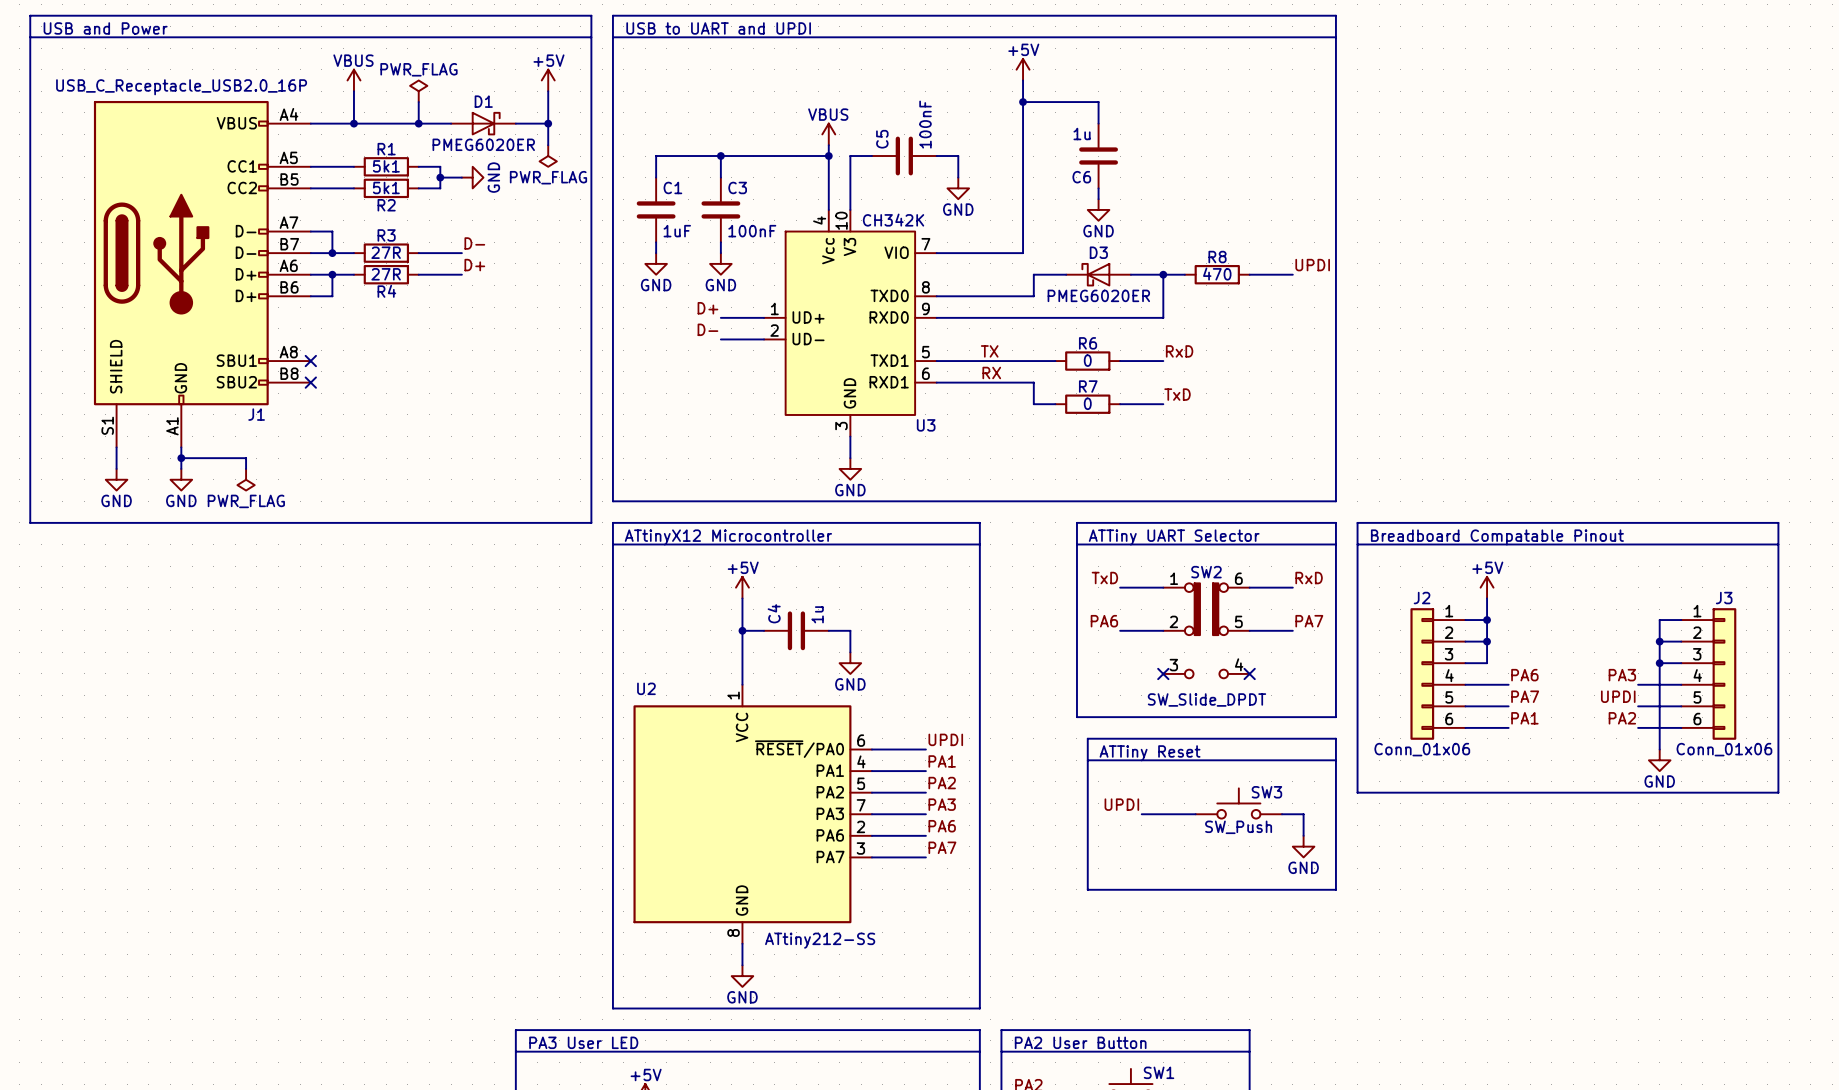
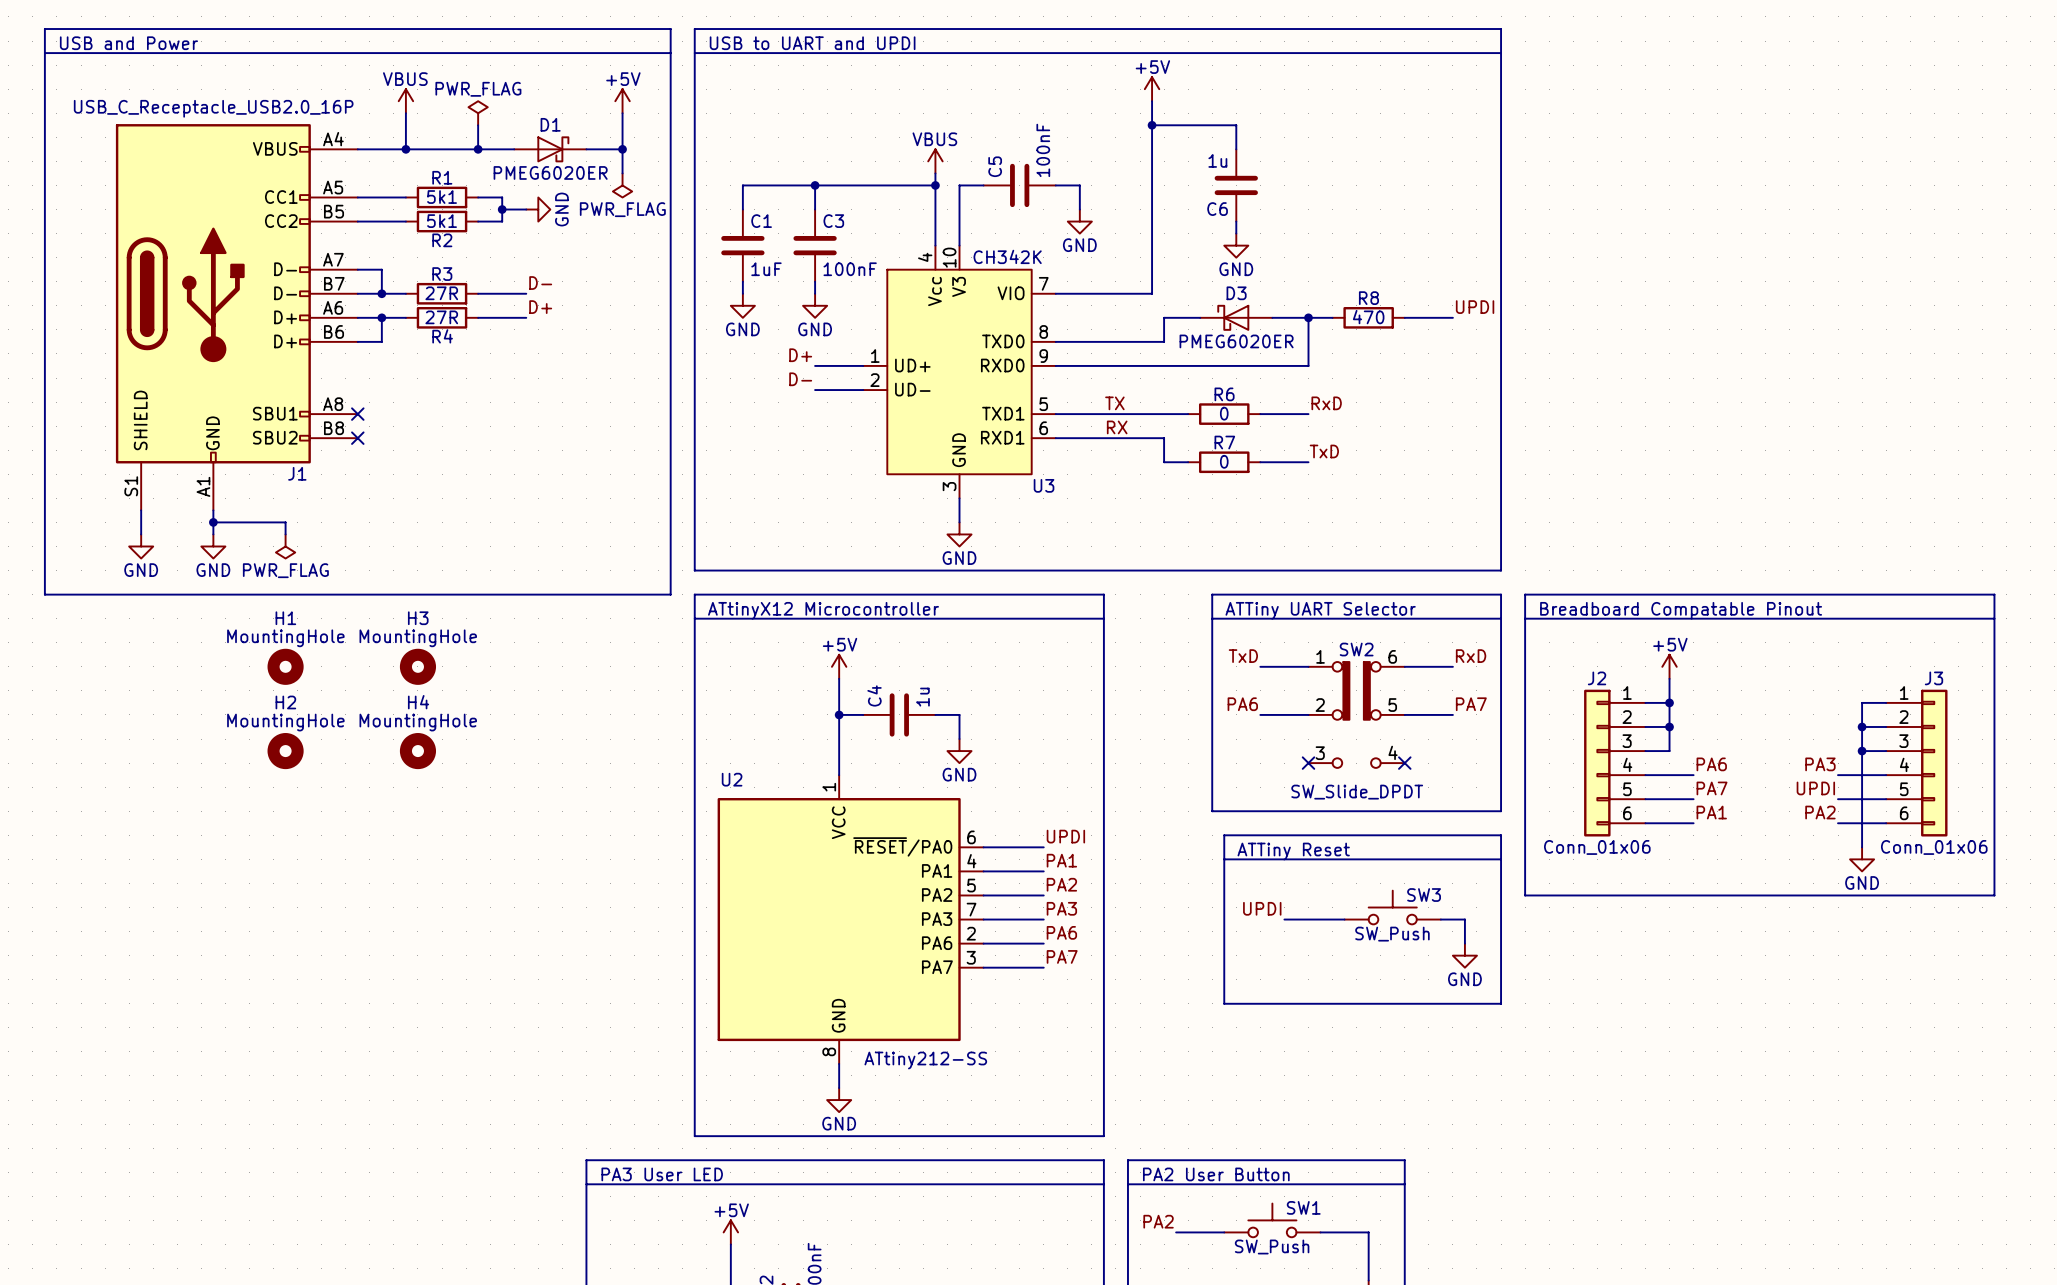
H1: none -> MountingHole (285, 666)
H3: none -> MountingHole (417, 666)
H2: none -> MountingHole (285, 751)
H4: none -> MountingHole (417, 751)

